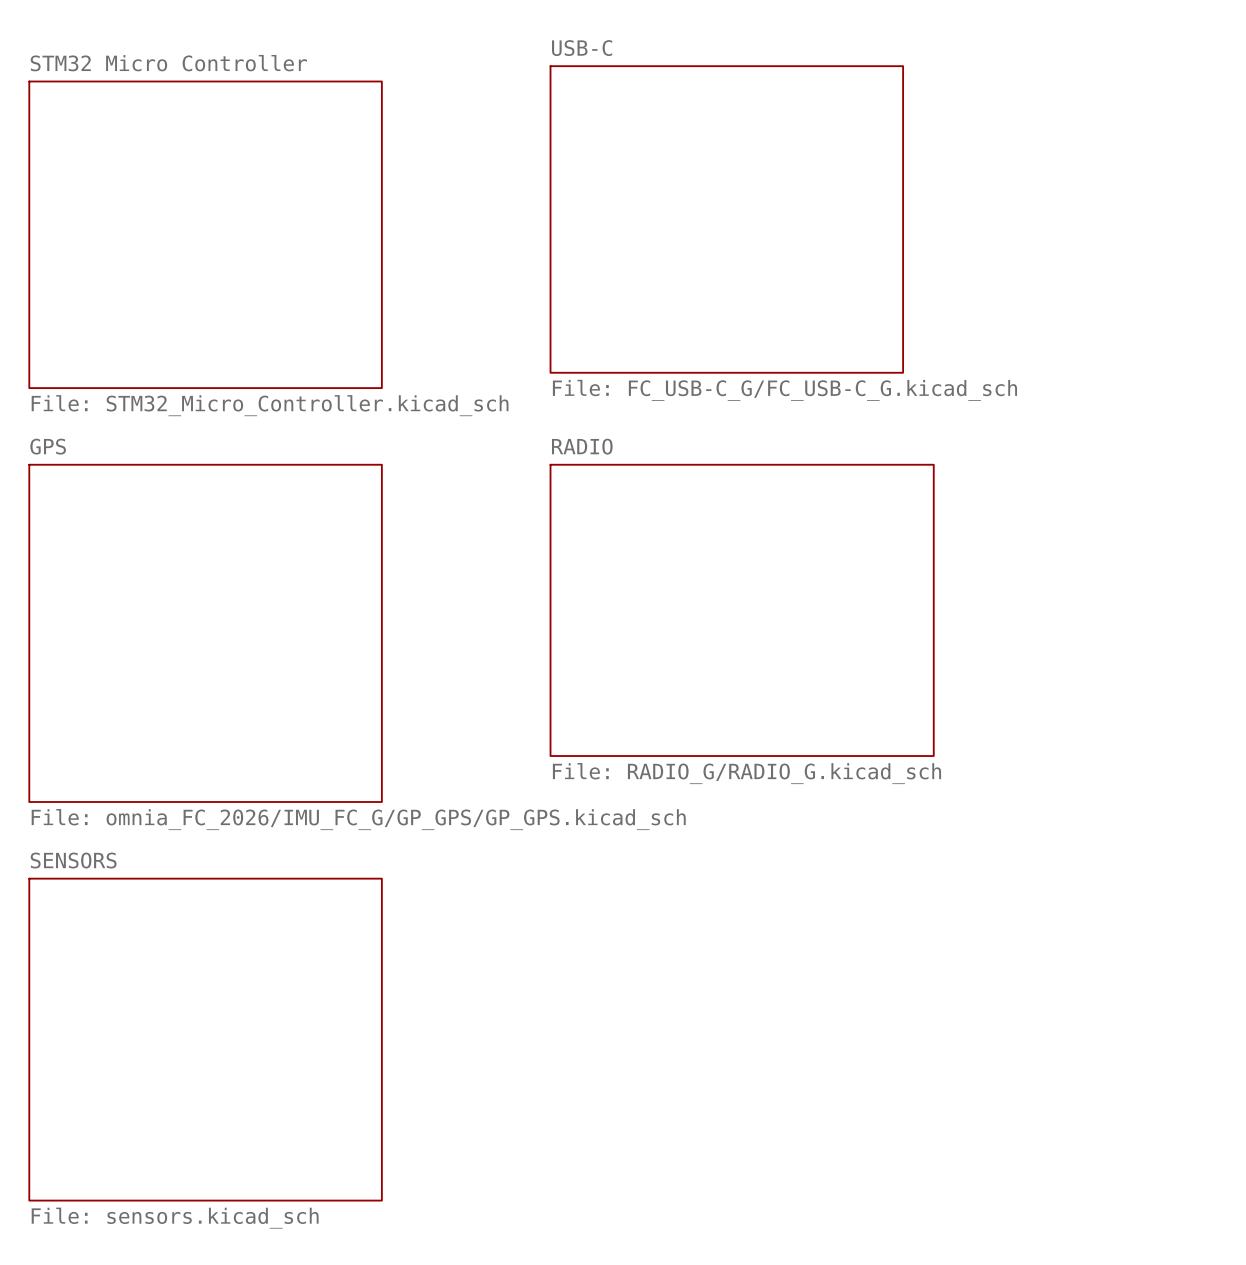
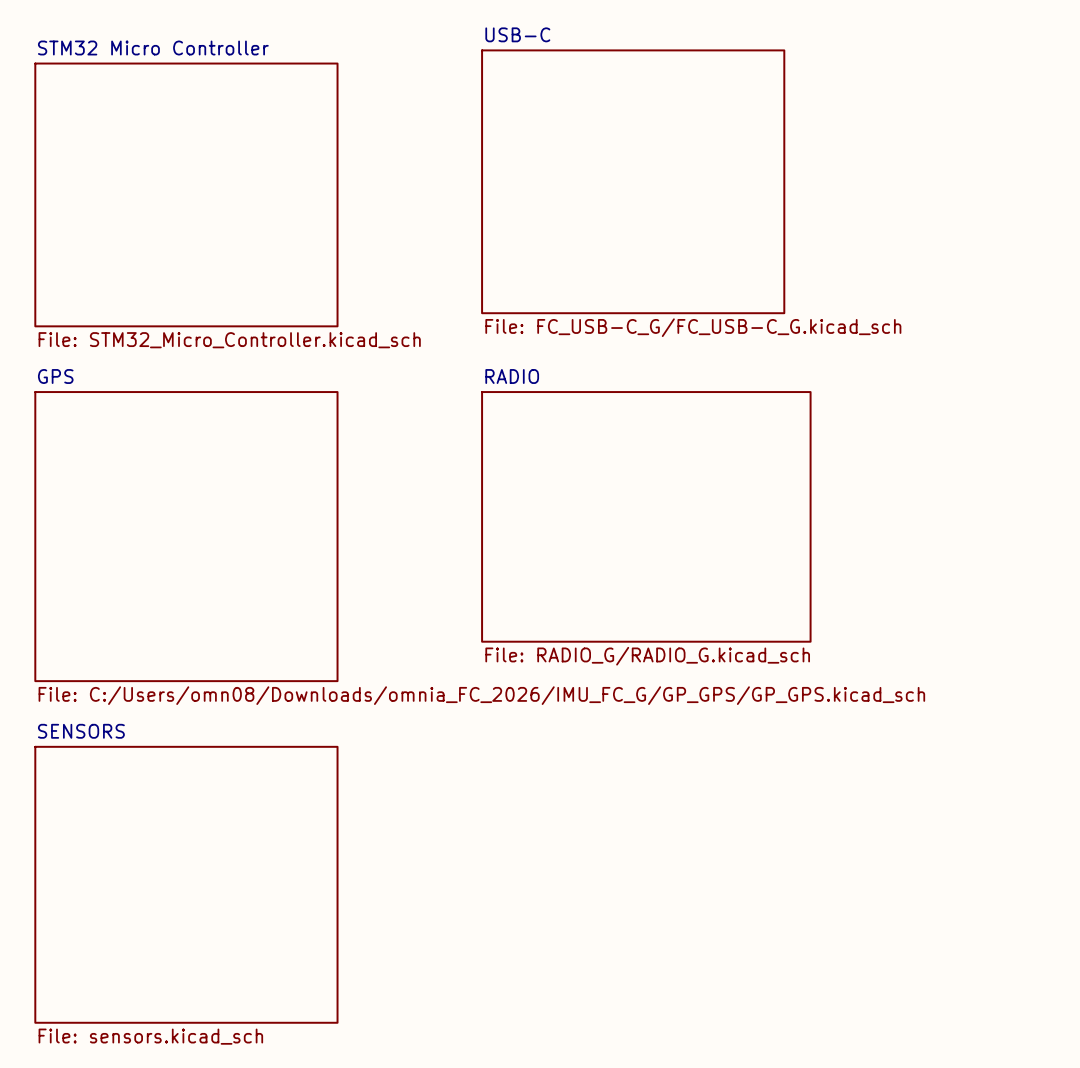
sheet GPS value: File: omnia_FC_2026/IMU_FC_G/GP_GPS/GP_GPS.kicad_sch (358, 819) -> File: C:/Users/omn08/Downloads/omnia_FC_2026/IMU_FC_G/GP_GPS/GP_GPS.kicad_sch (481, 695)

